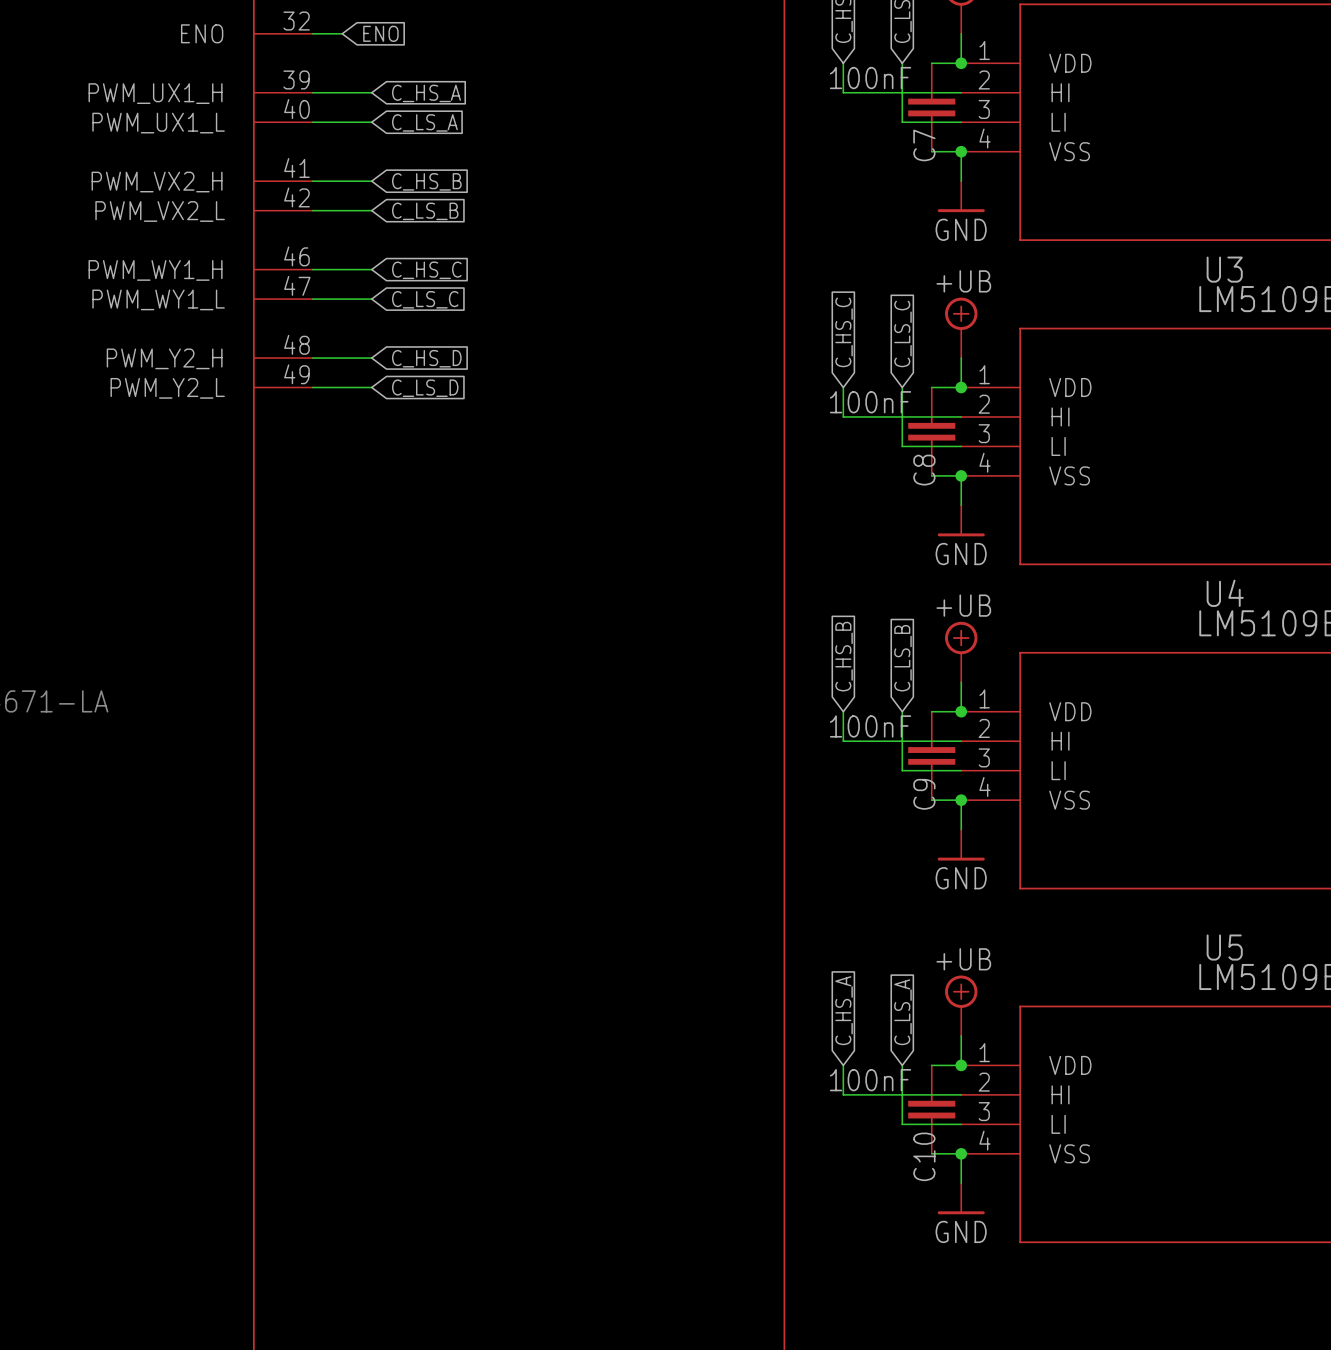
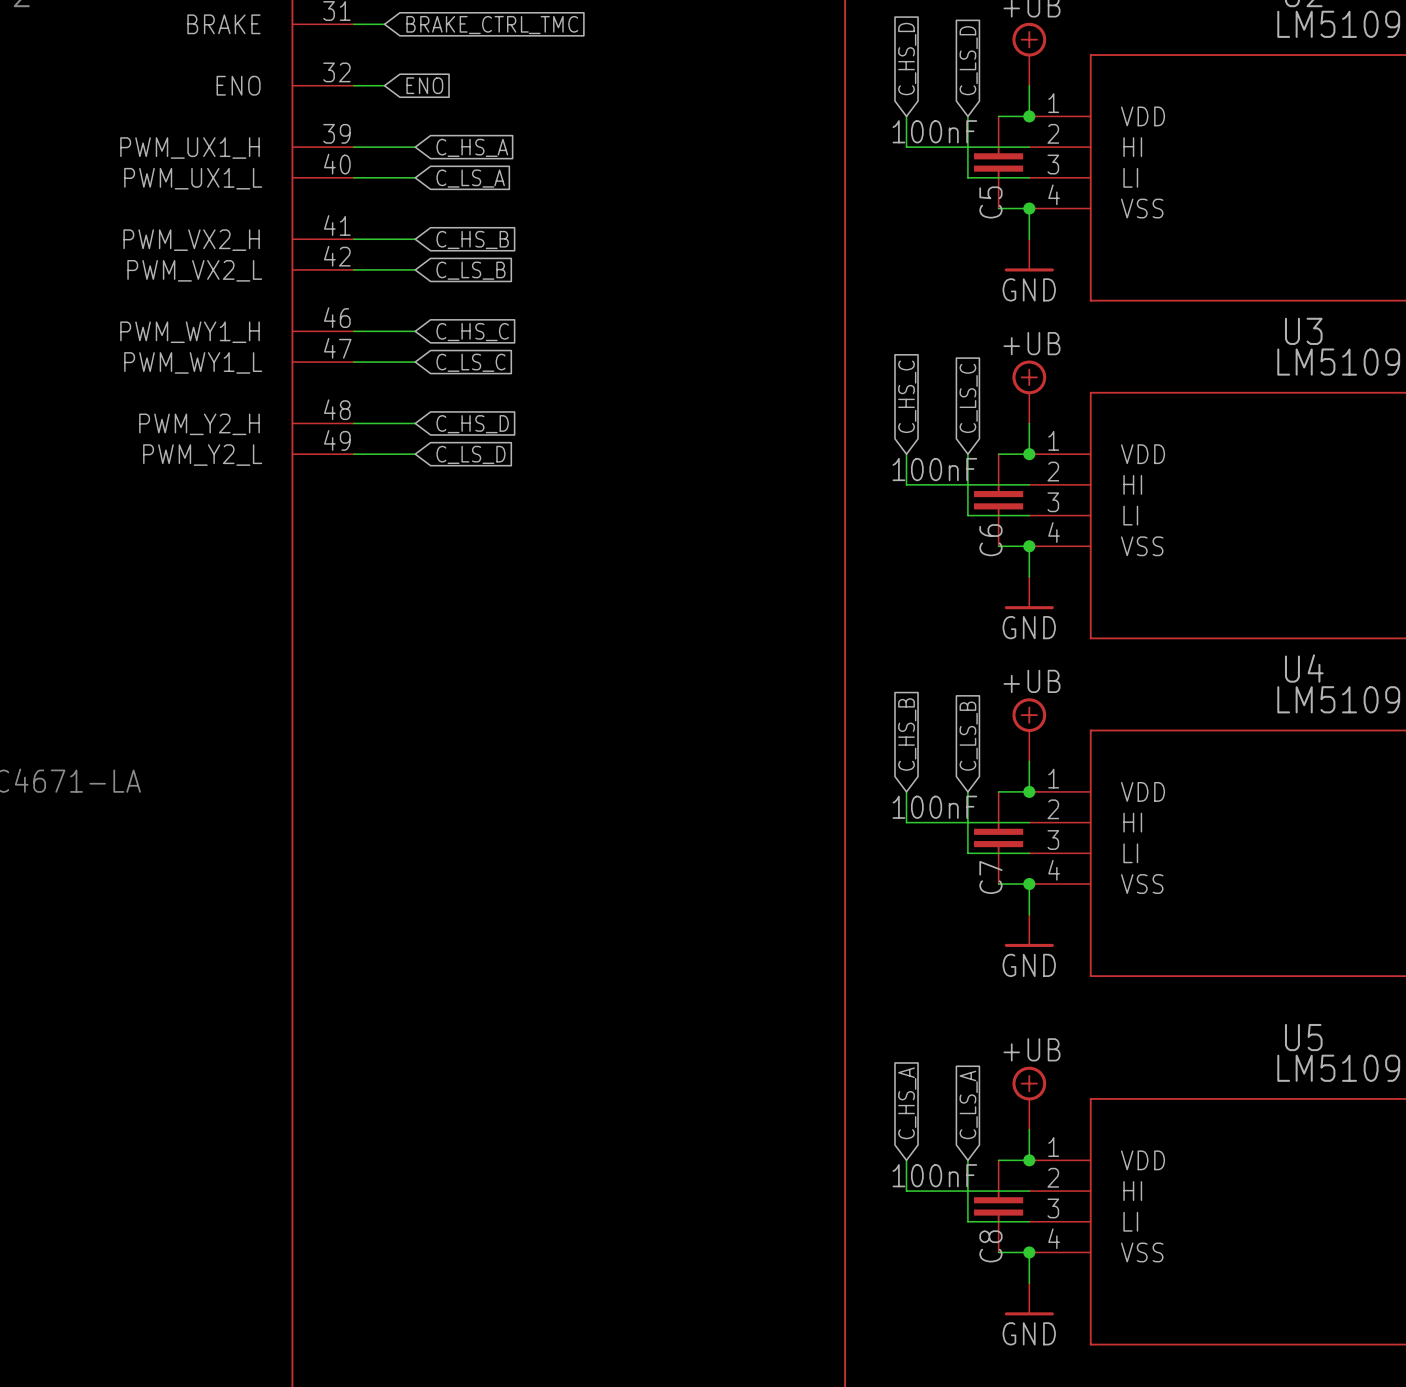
C7 name: C7 (924, 145) -> C5 (990, 202)
C8 name: C8 (924, 470) -> C6 (990, 540)
C9 name: C9 (924, 794) -> C7 (990, 877)
C10 name: C10 (924, 1156) -> C8 (990, 1246)

